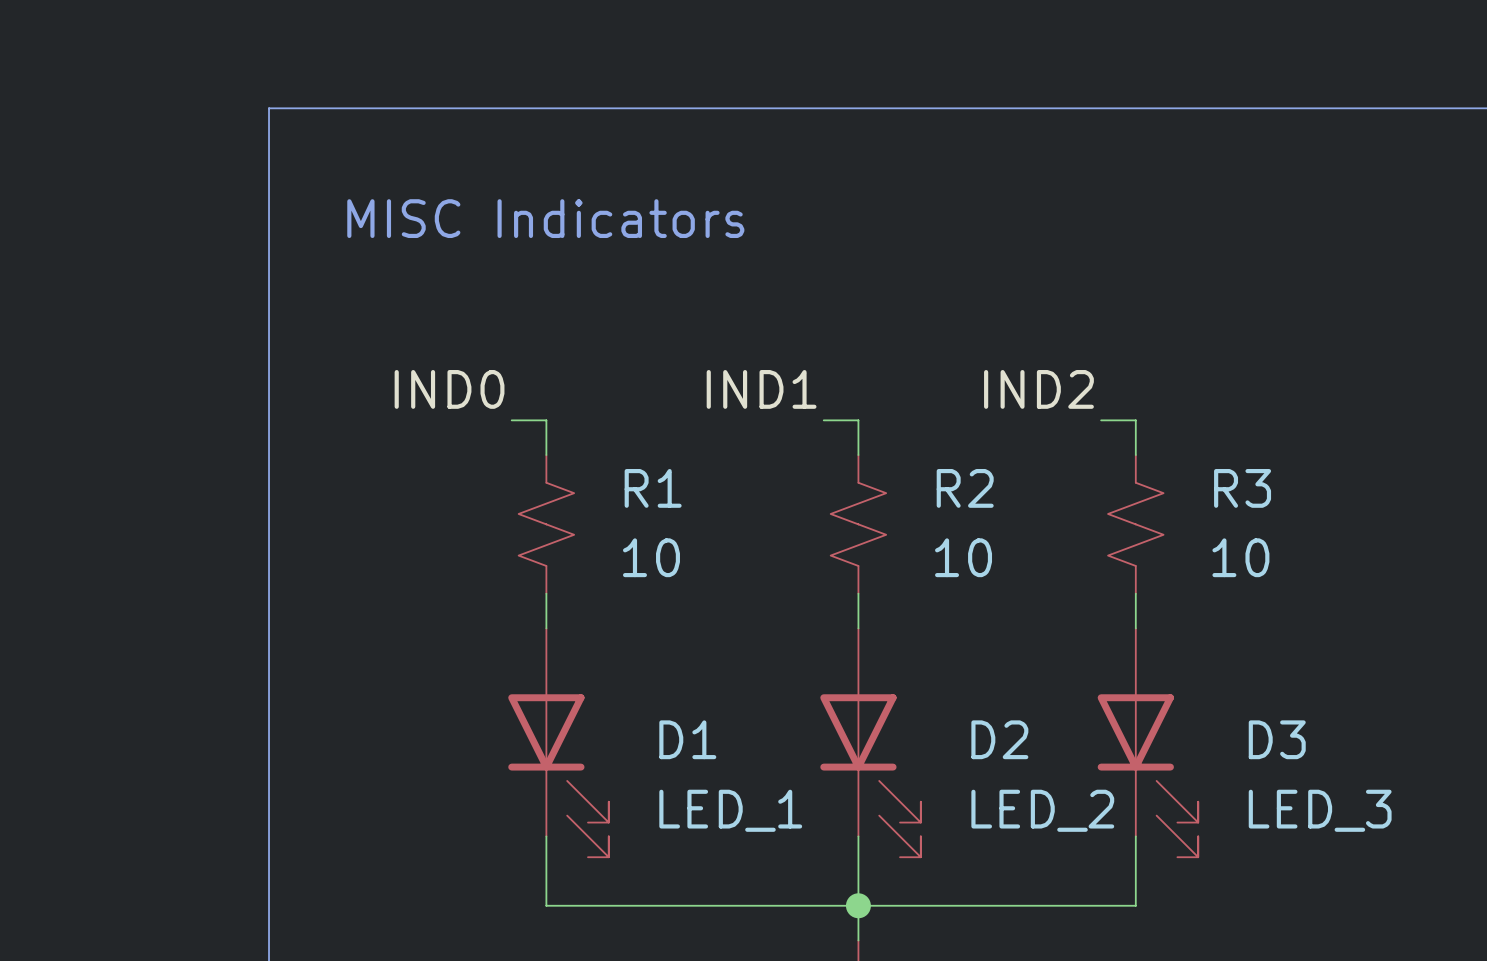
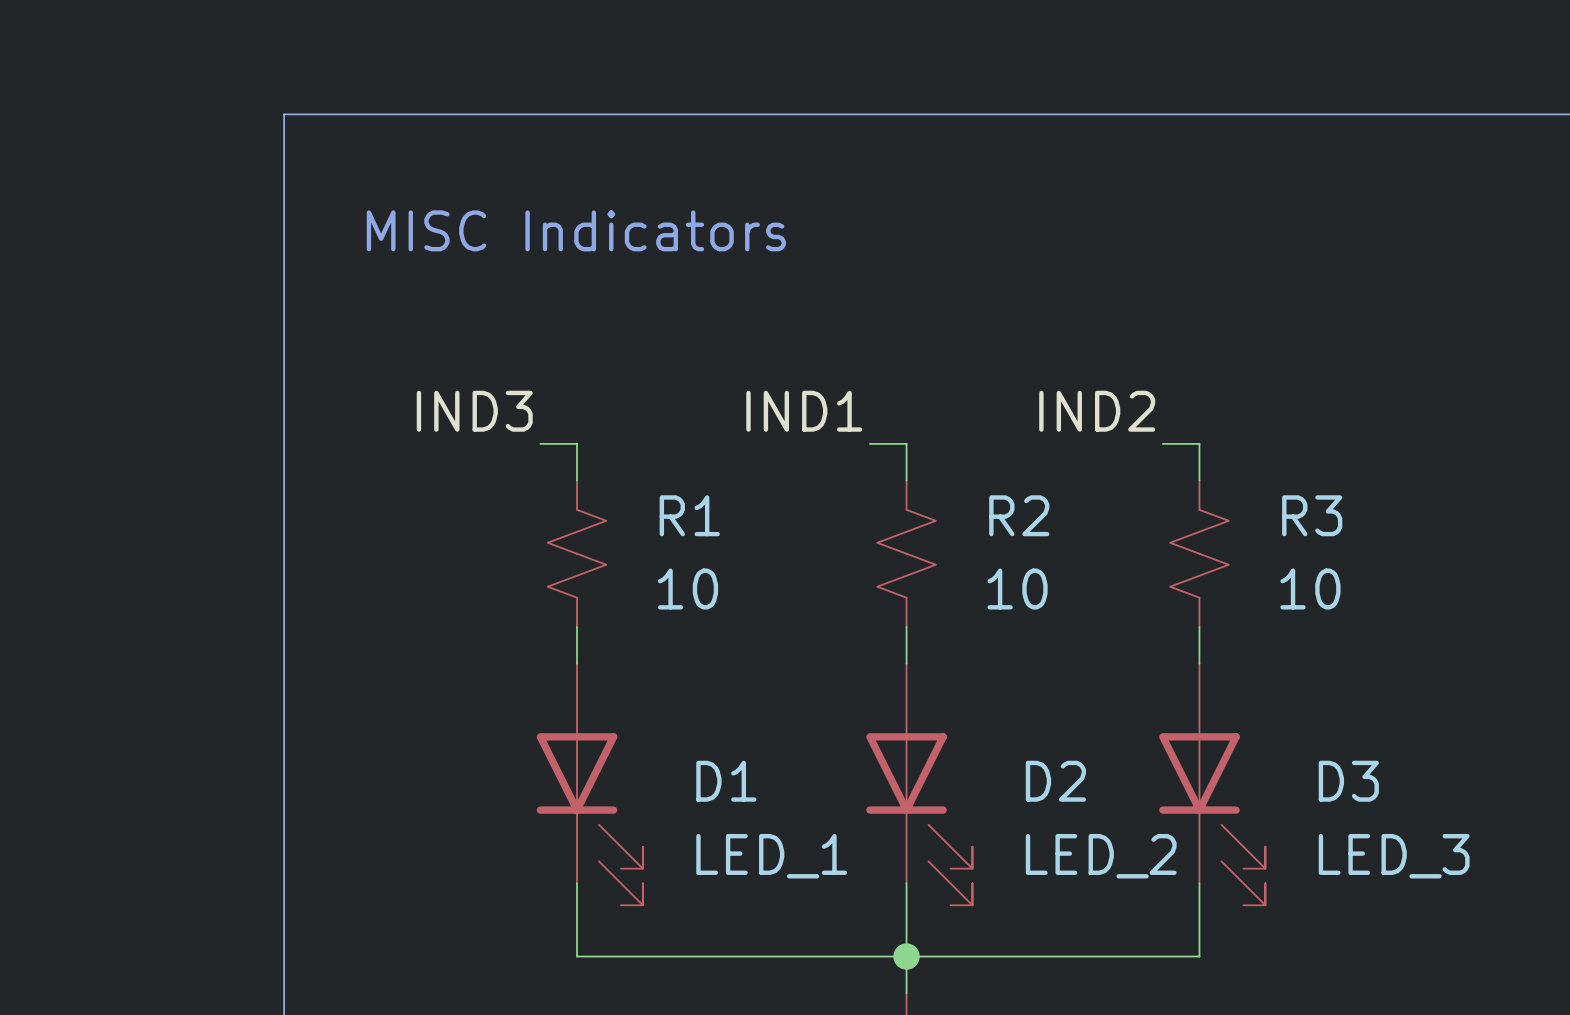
label: IND0 (449, 389) -> IND3 (474, 411)

